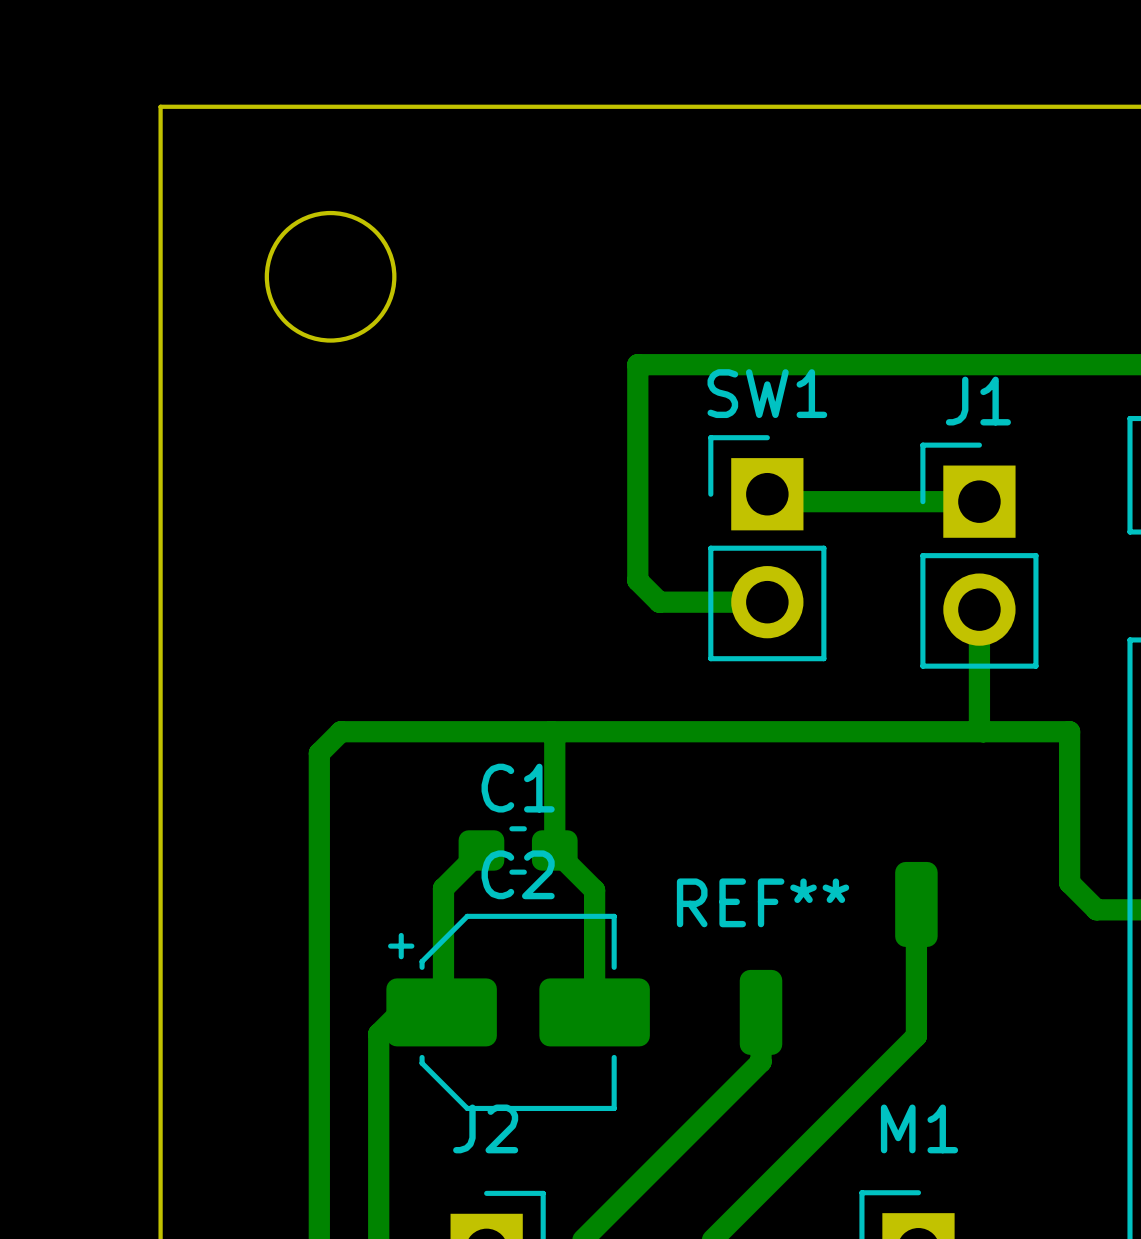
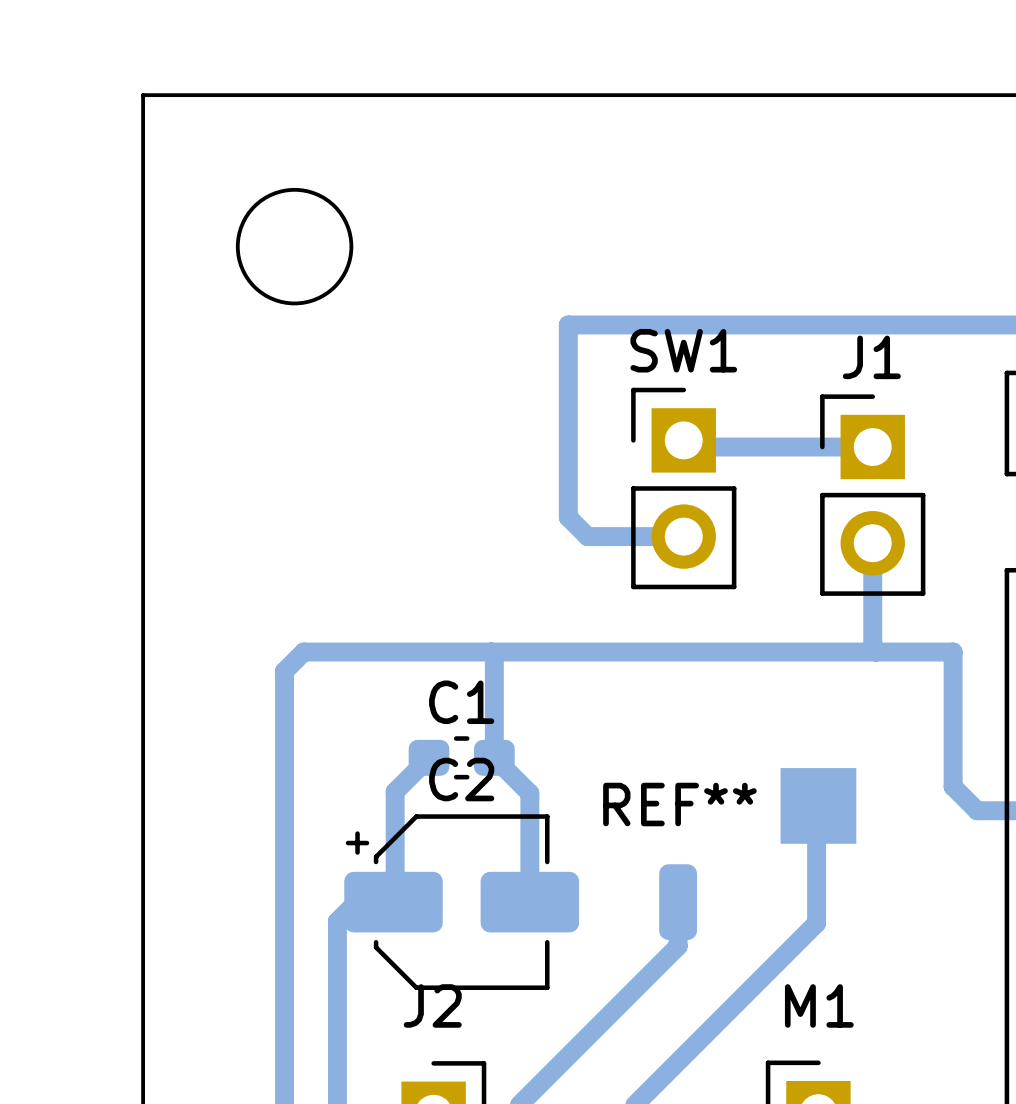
part footprint: [895, 861, 938, 947] -> [780, 768, 857, 844]

